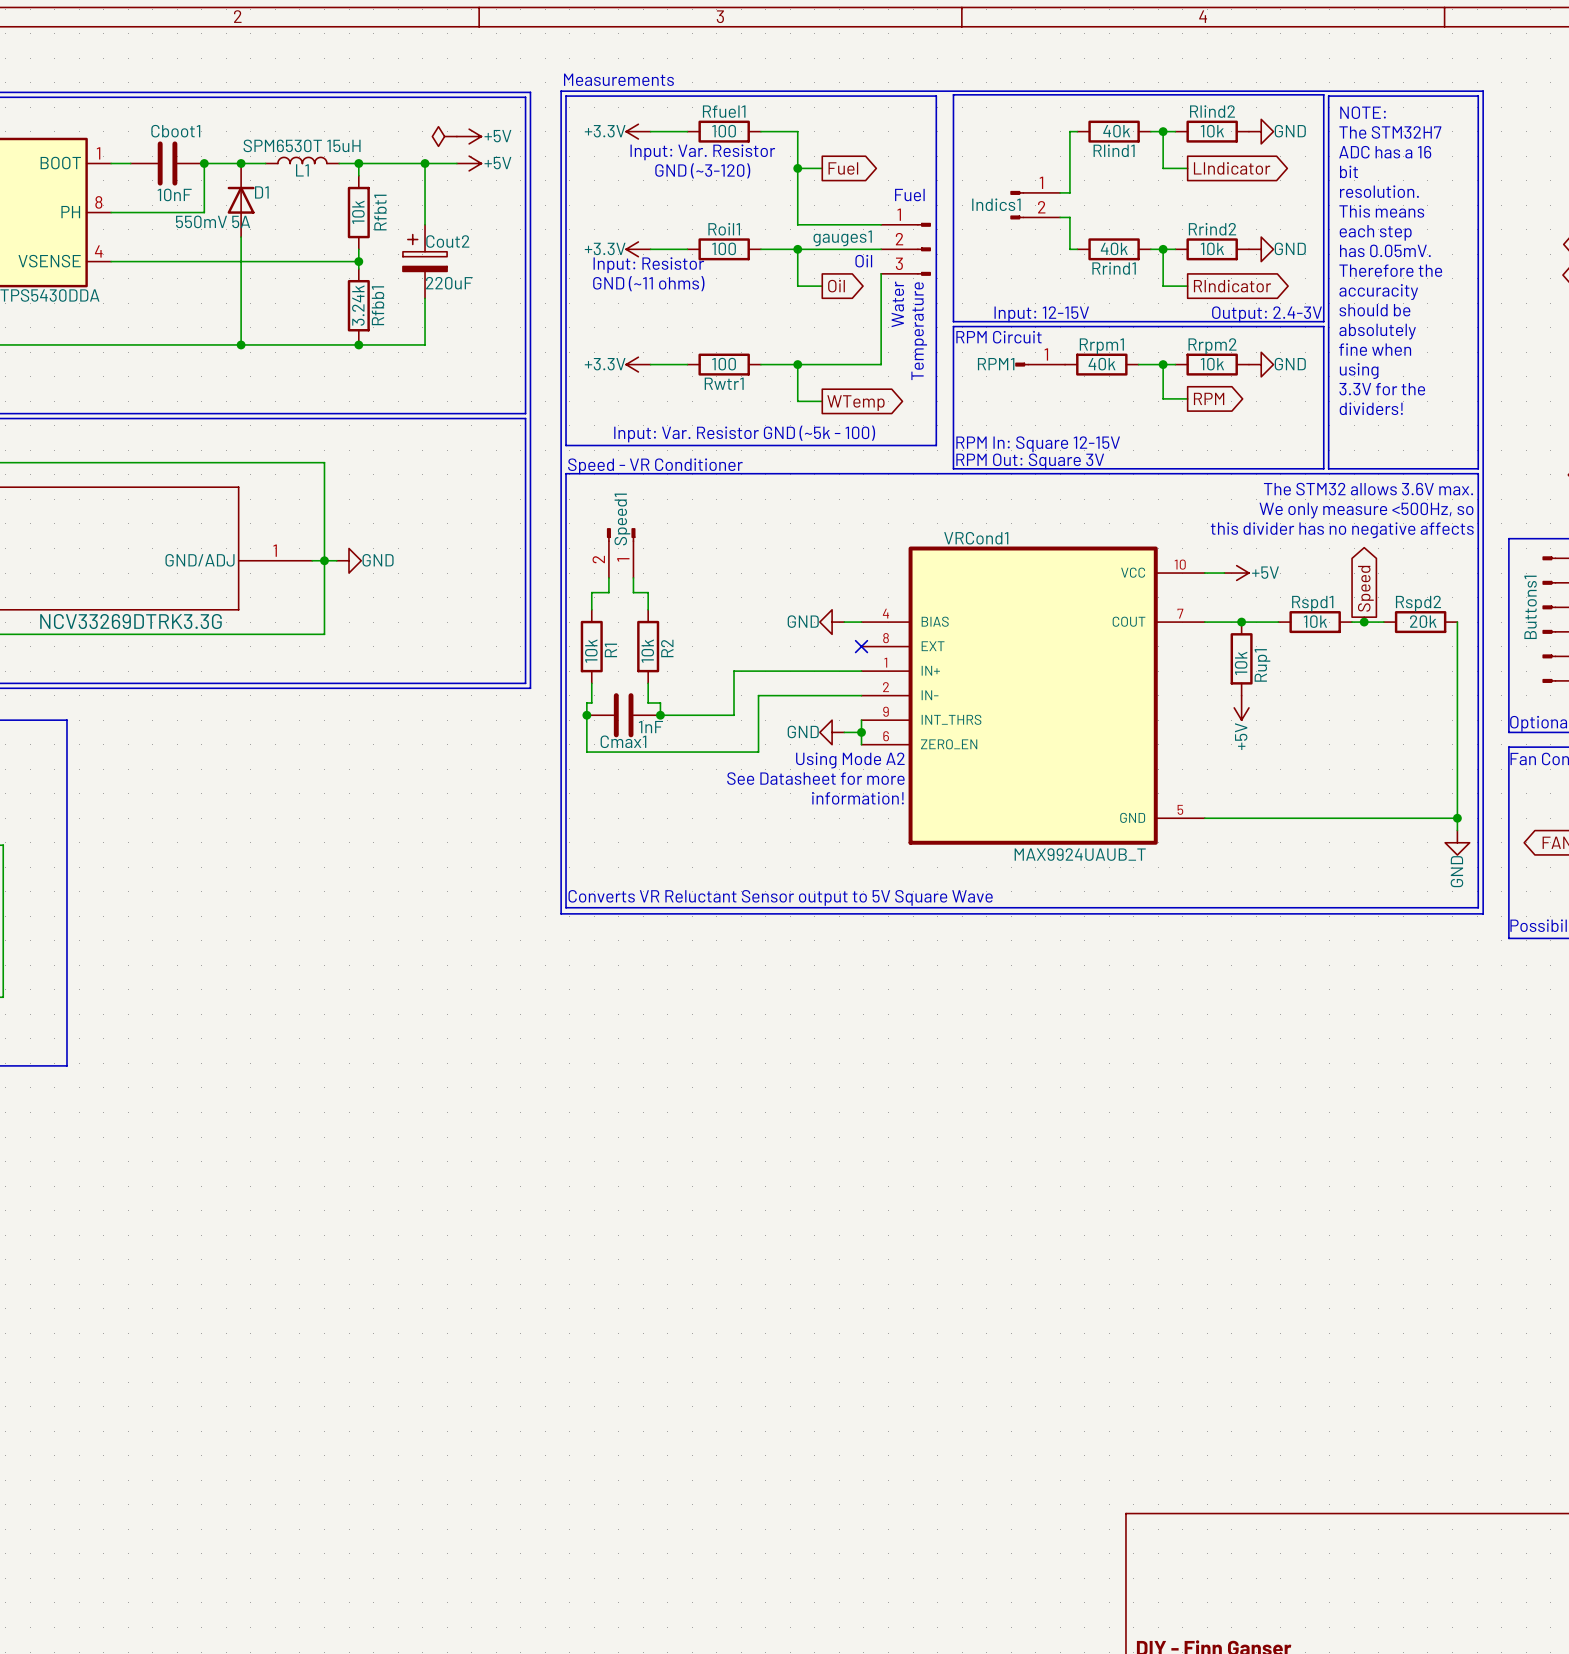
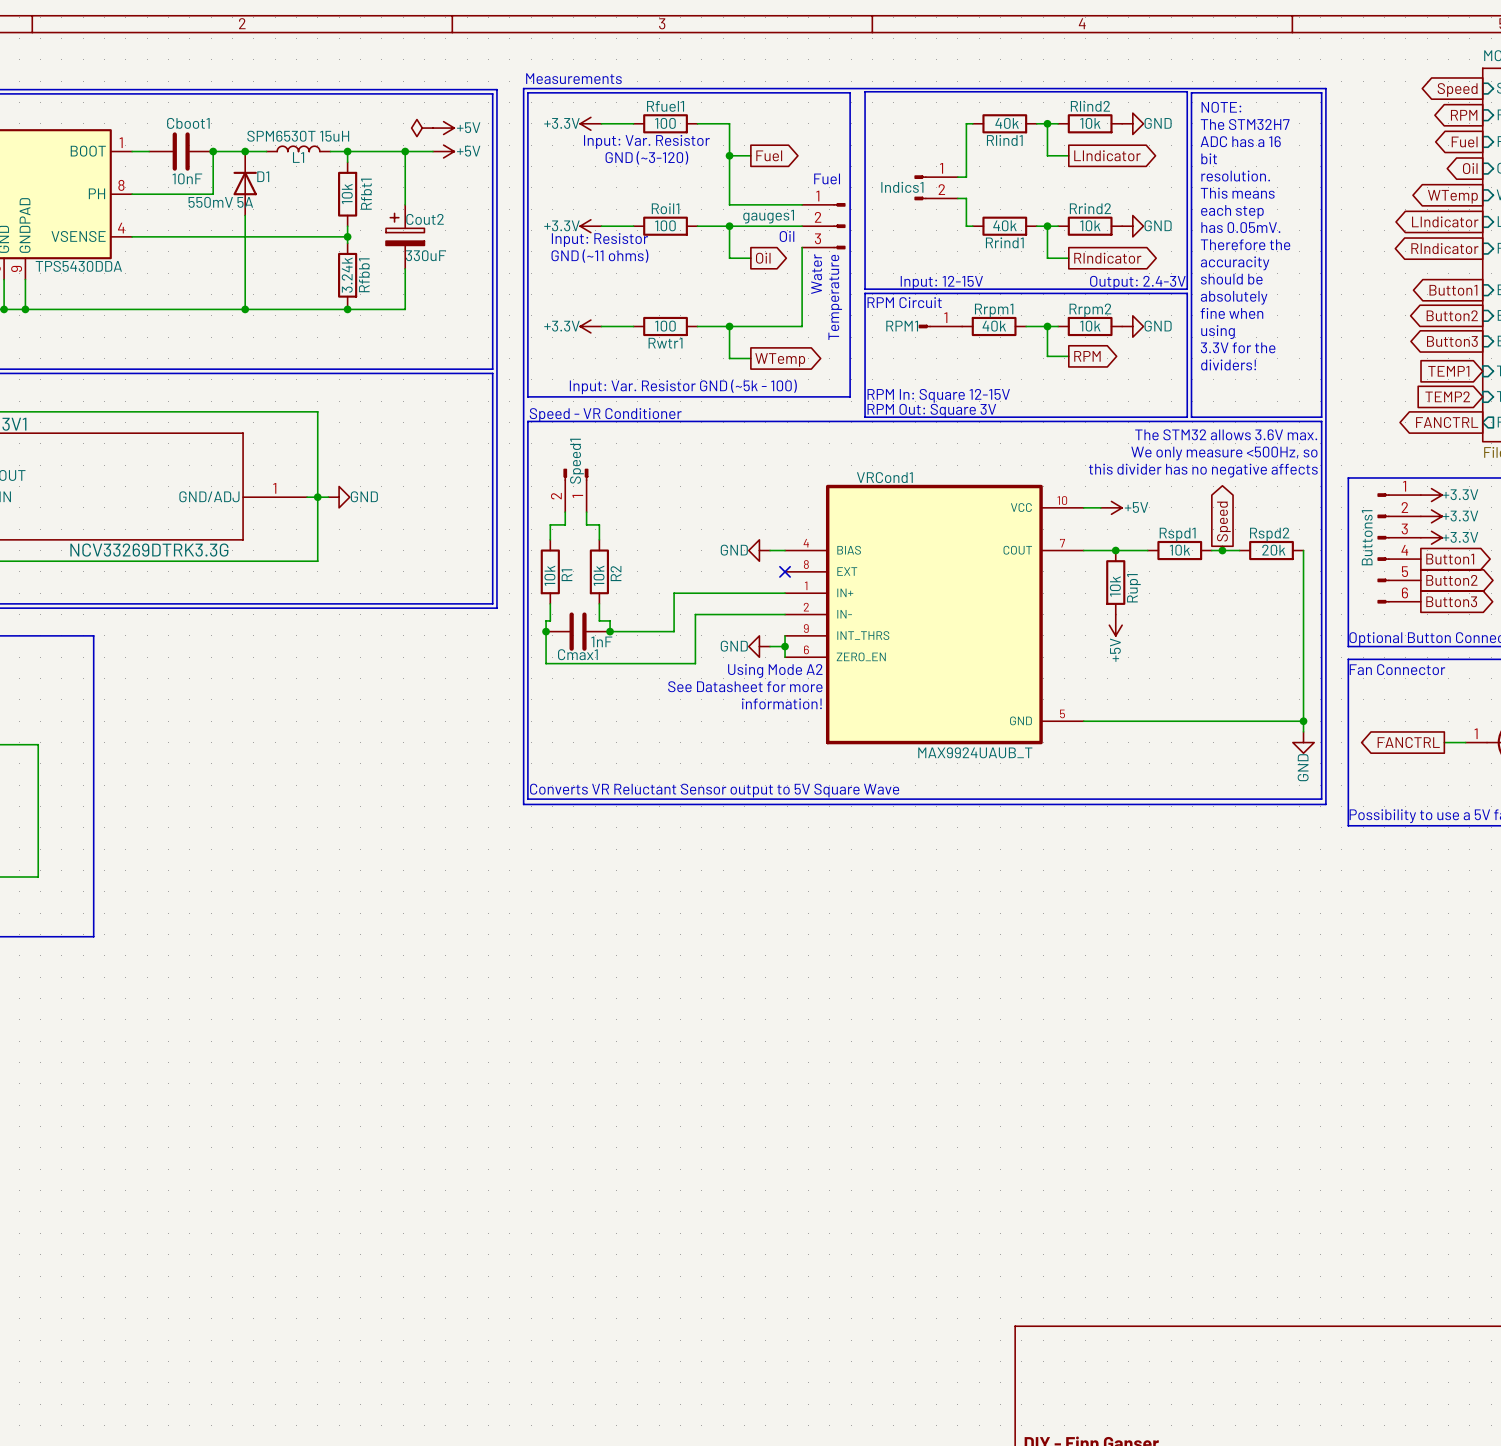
Cout2 value: 220uF (449, 283) -> 330uF (426, 255)

